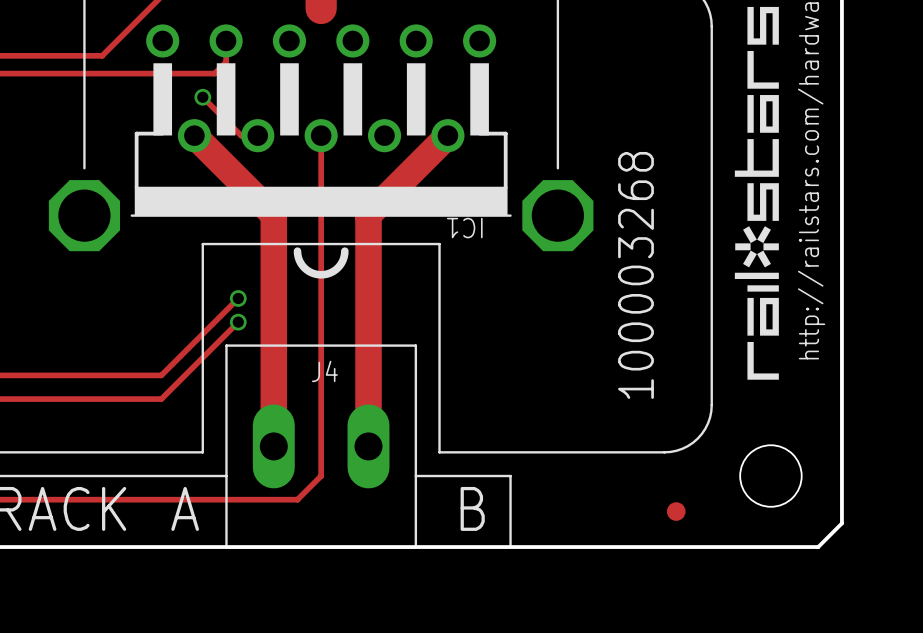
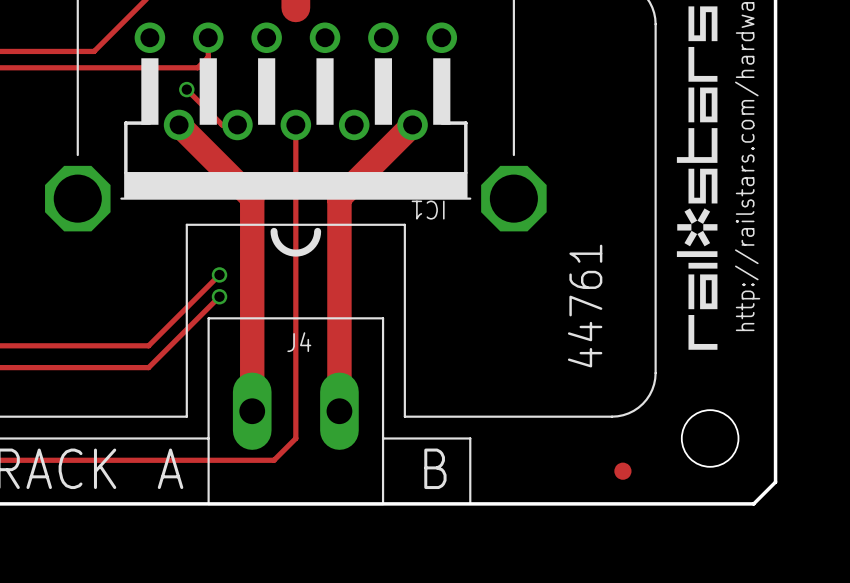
text: 100003268 (636, 275) -> 44761 (585, 306)

